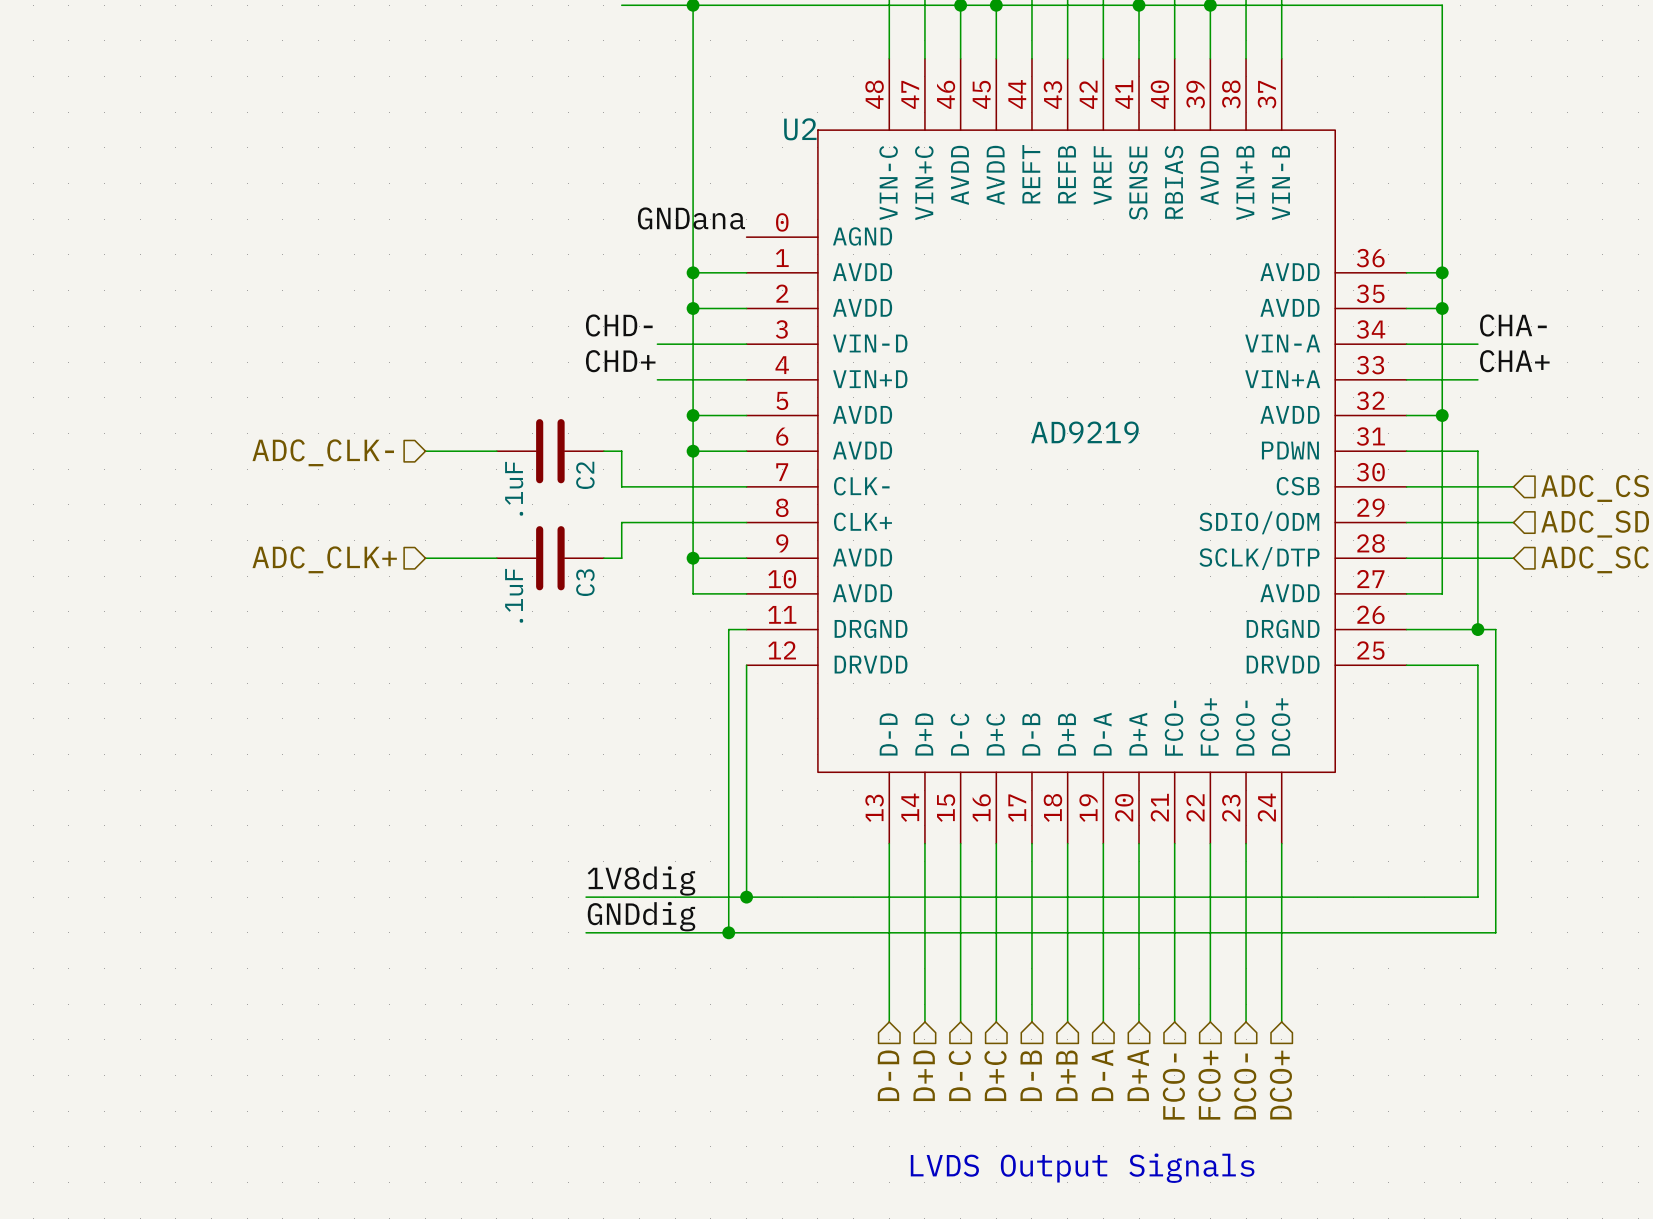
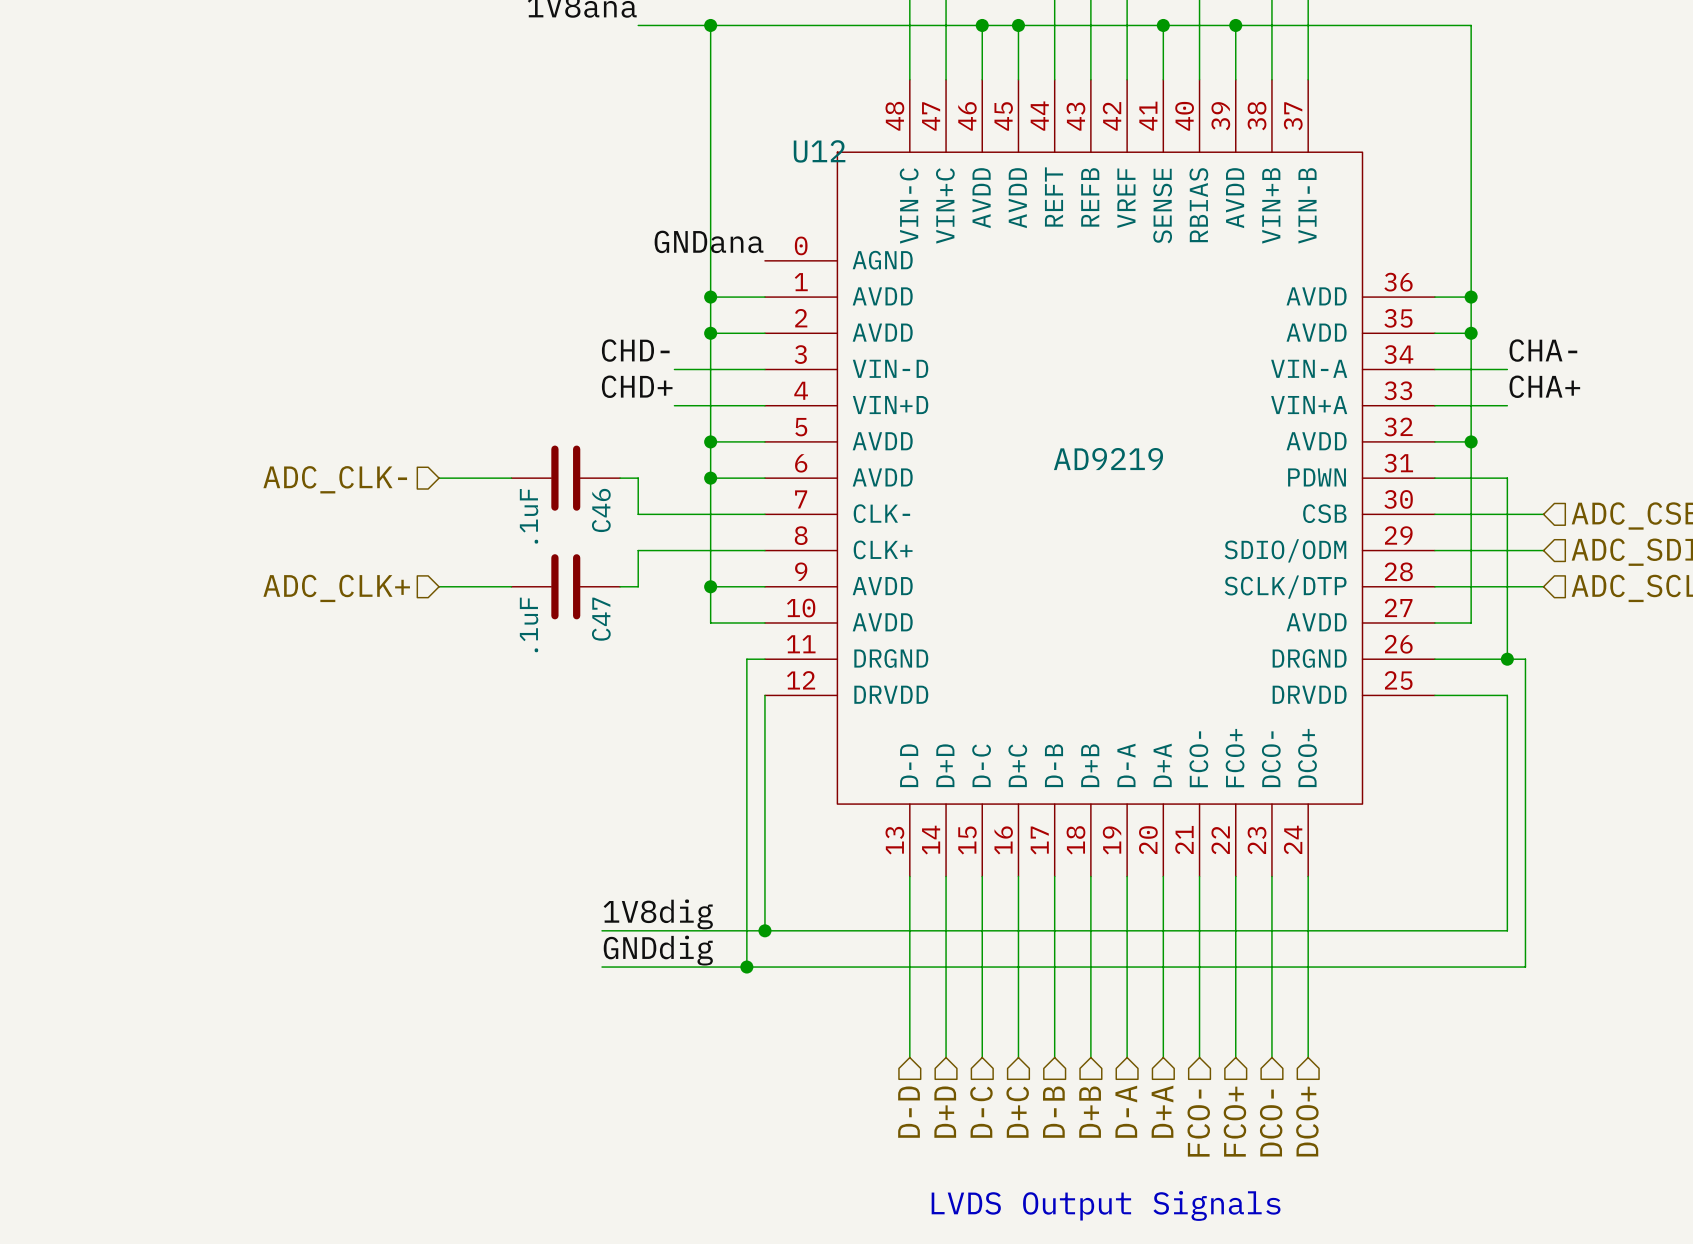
U2 name: U2 (800, 129) -> U12 (819, 151)
C2 name: C2 (585, 475) -> C46 (601, 510)
C3 name: C3 (585, 582) -> C47 (601, 619)

